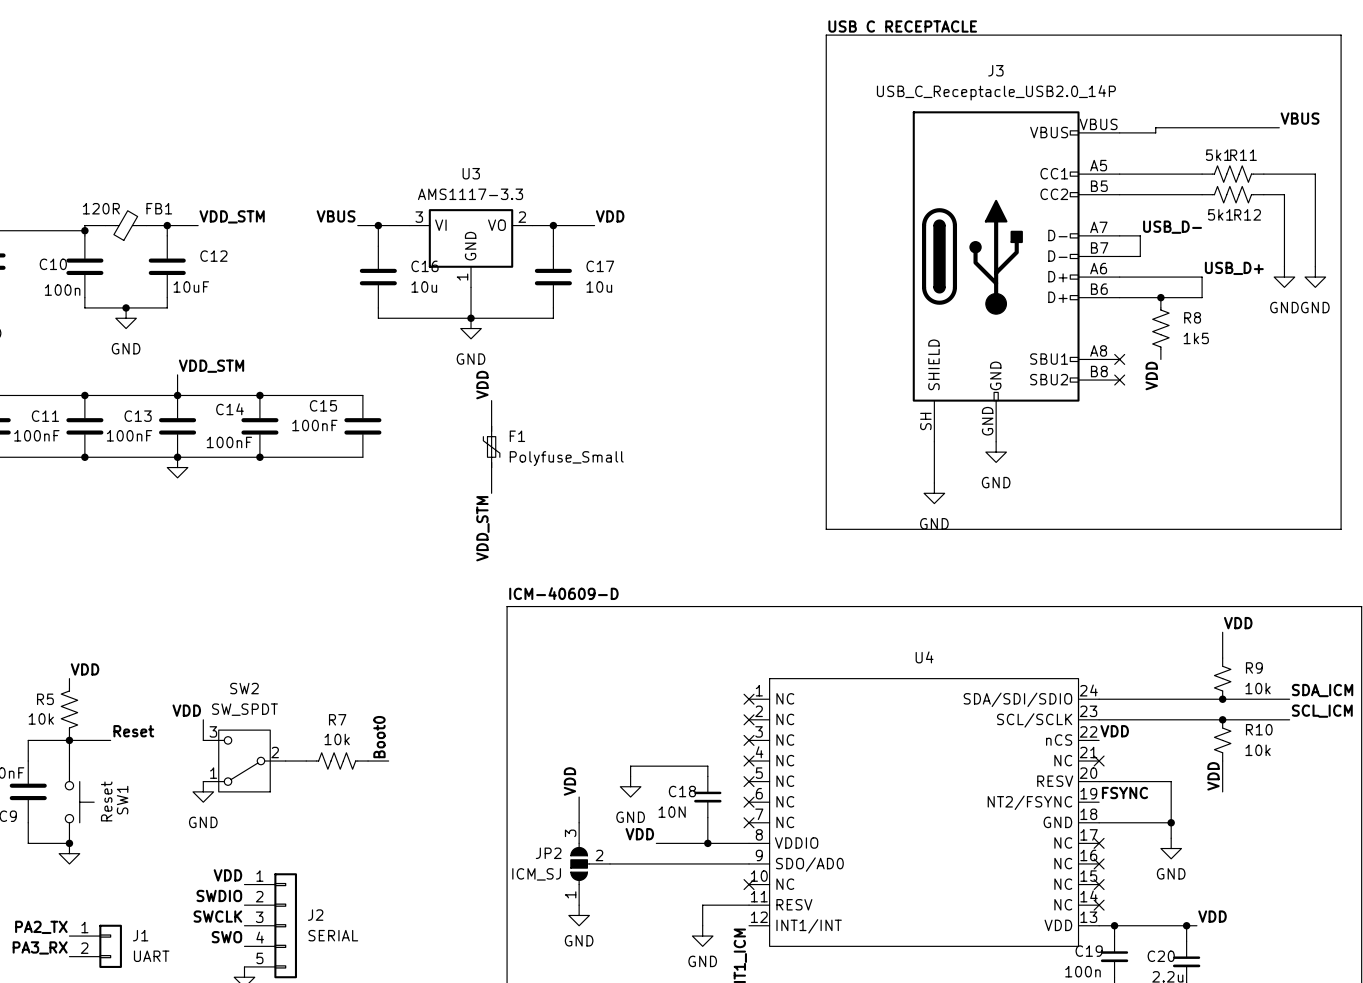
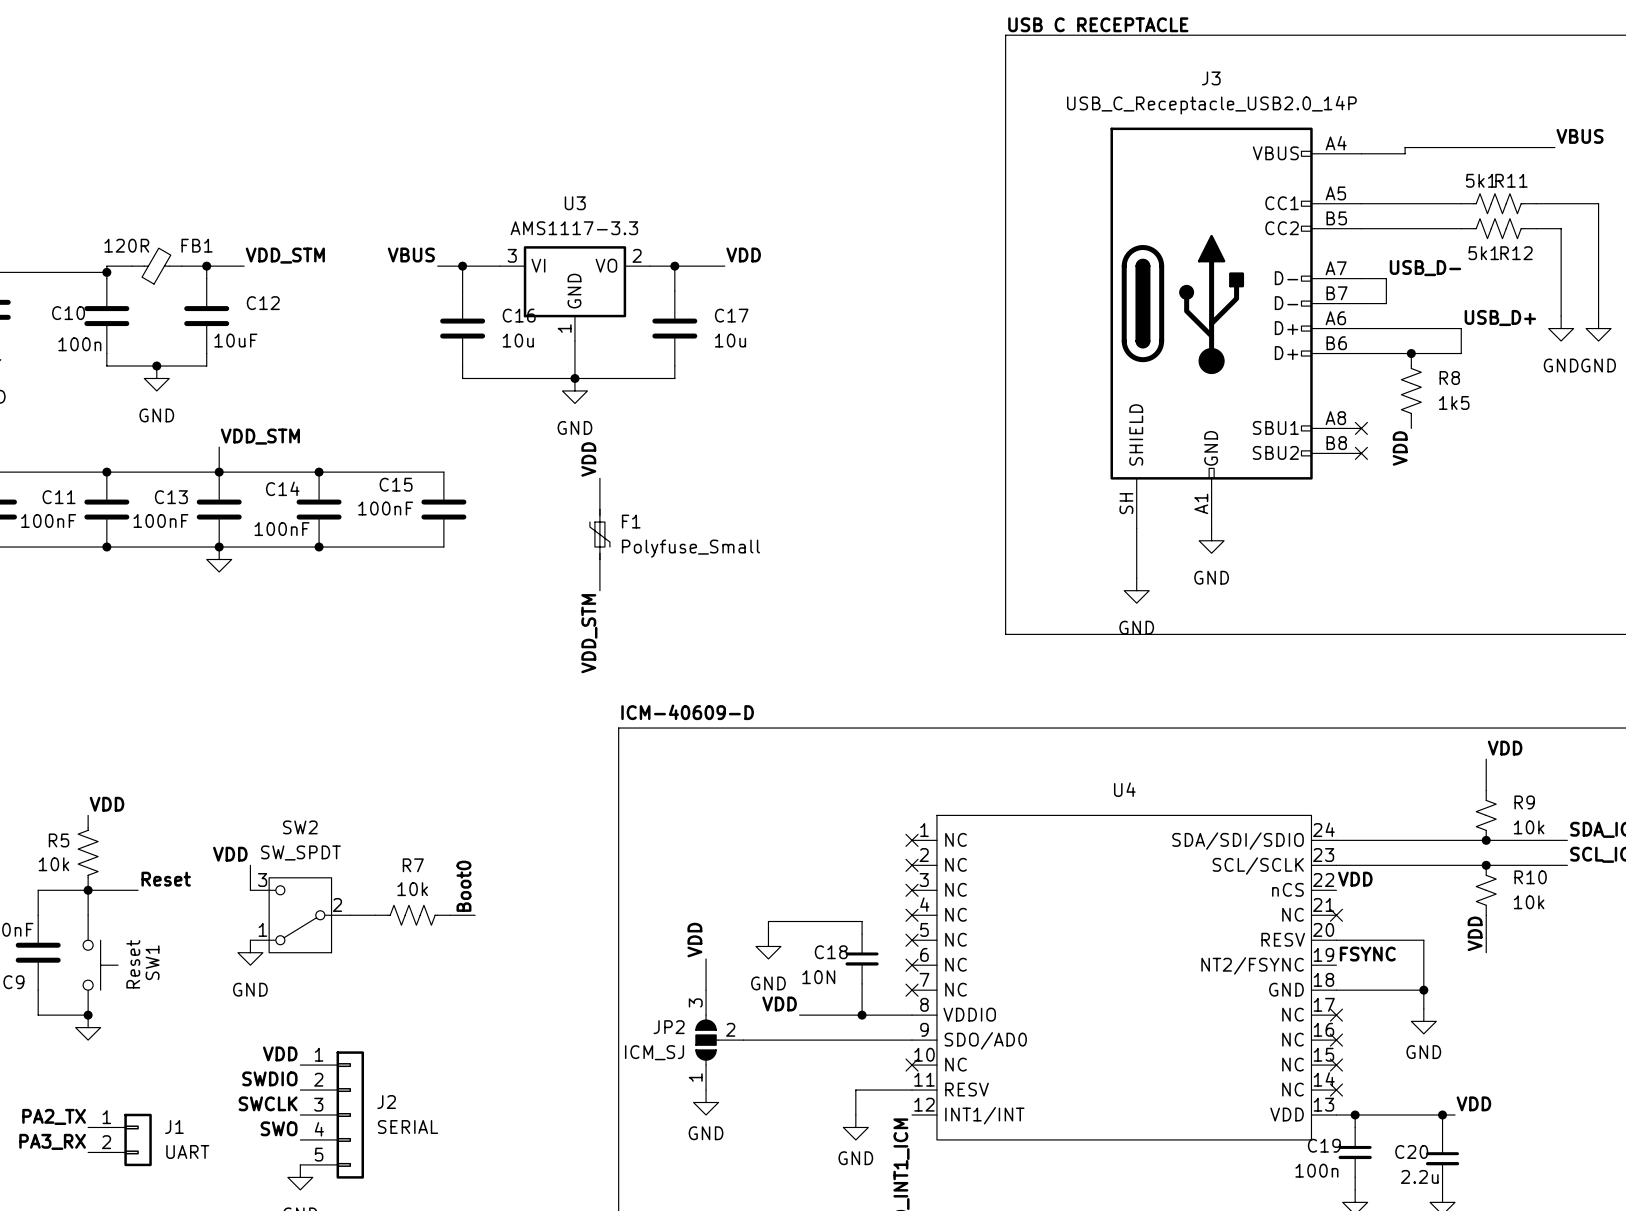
J3 pin number: VBUS (1098, 124) -> A4 (1336, 143)
J3 pin number: GND (987, 421) -> A1 (1201, 503)

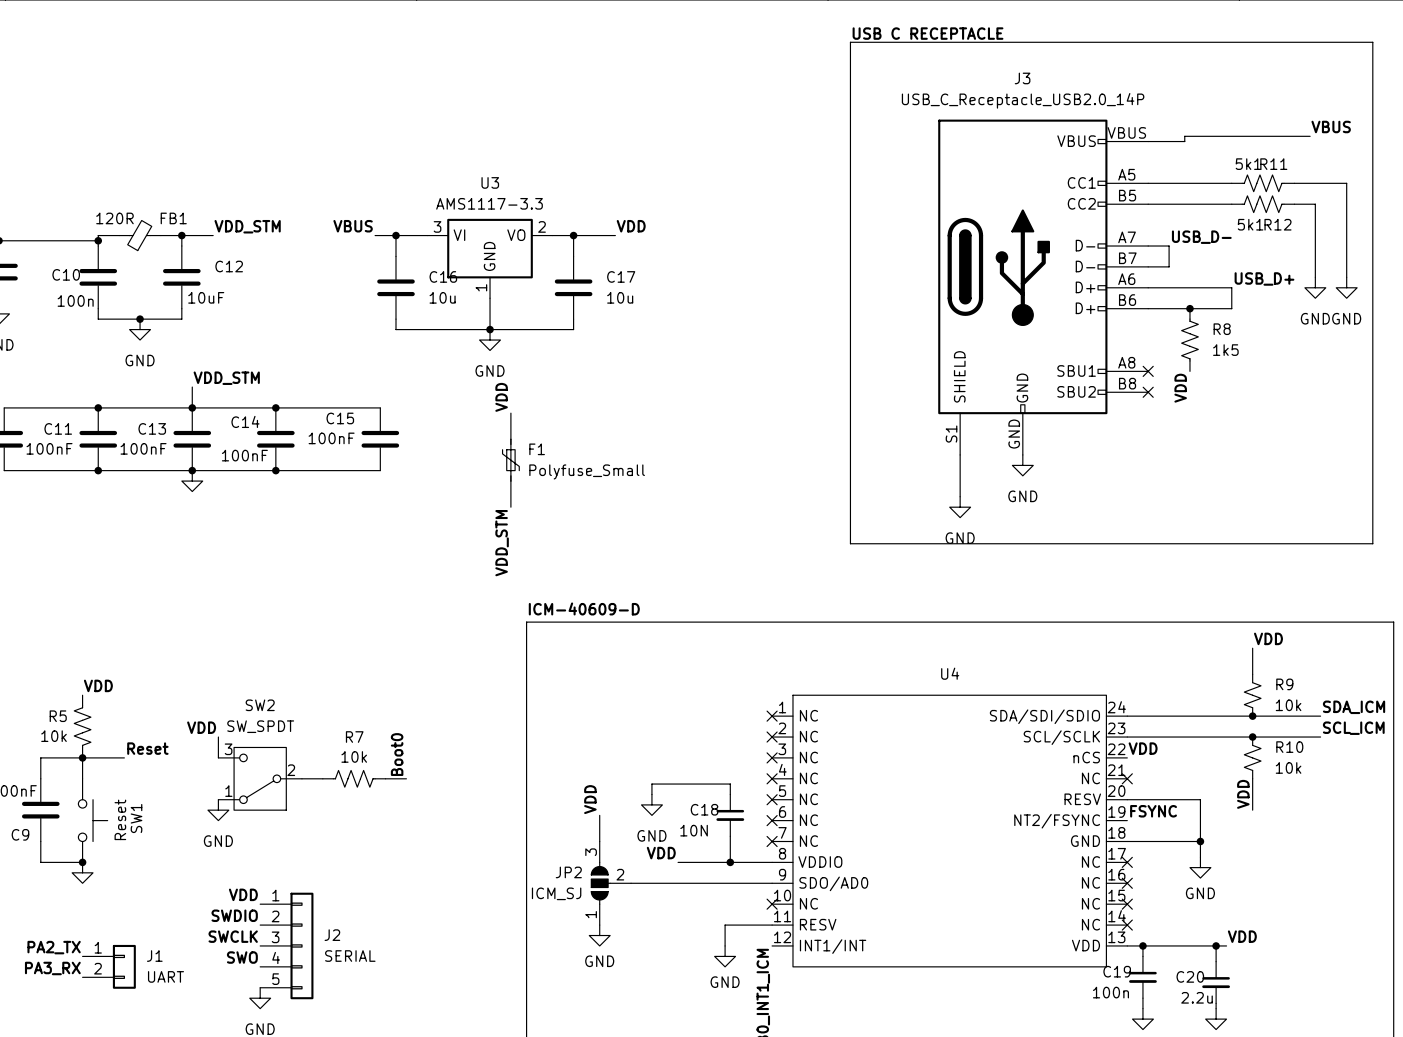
J3 pin number: A4 (1336, 143) -> VBUS (1126, 132)
J3 pin number: SH (1126, 503) -> S1 (951, 434)
J3 pin number: A1 (1201, 503) -> GND (1014, 434)

